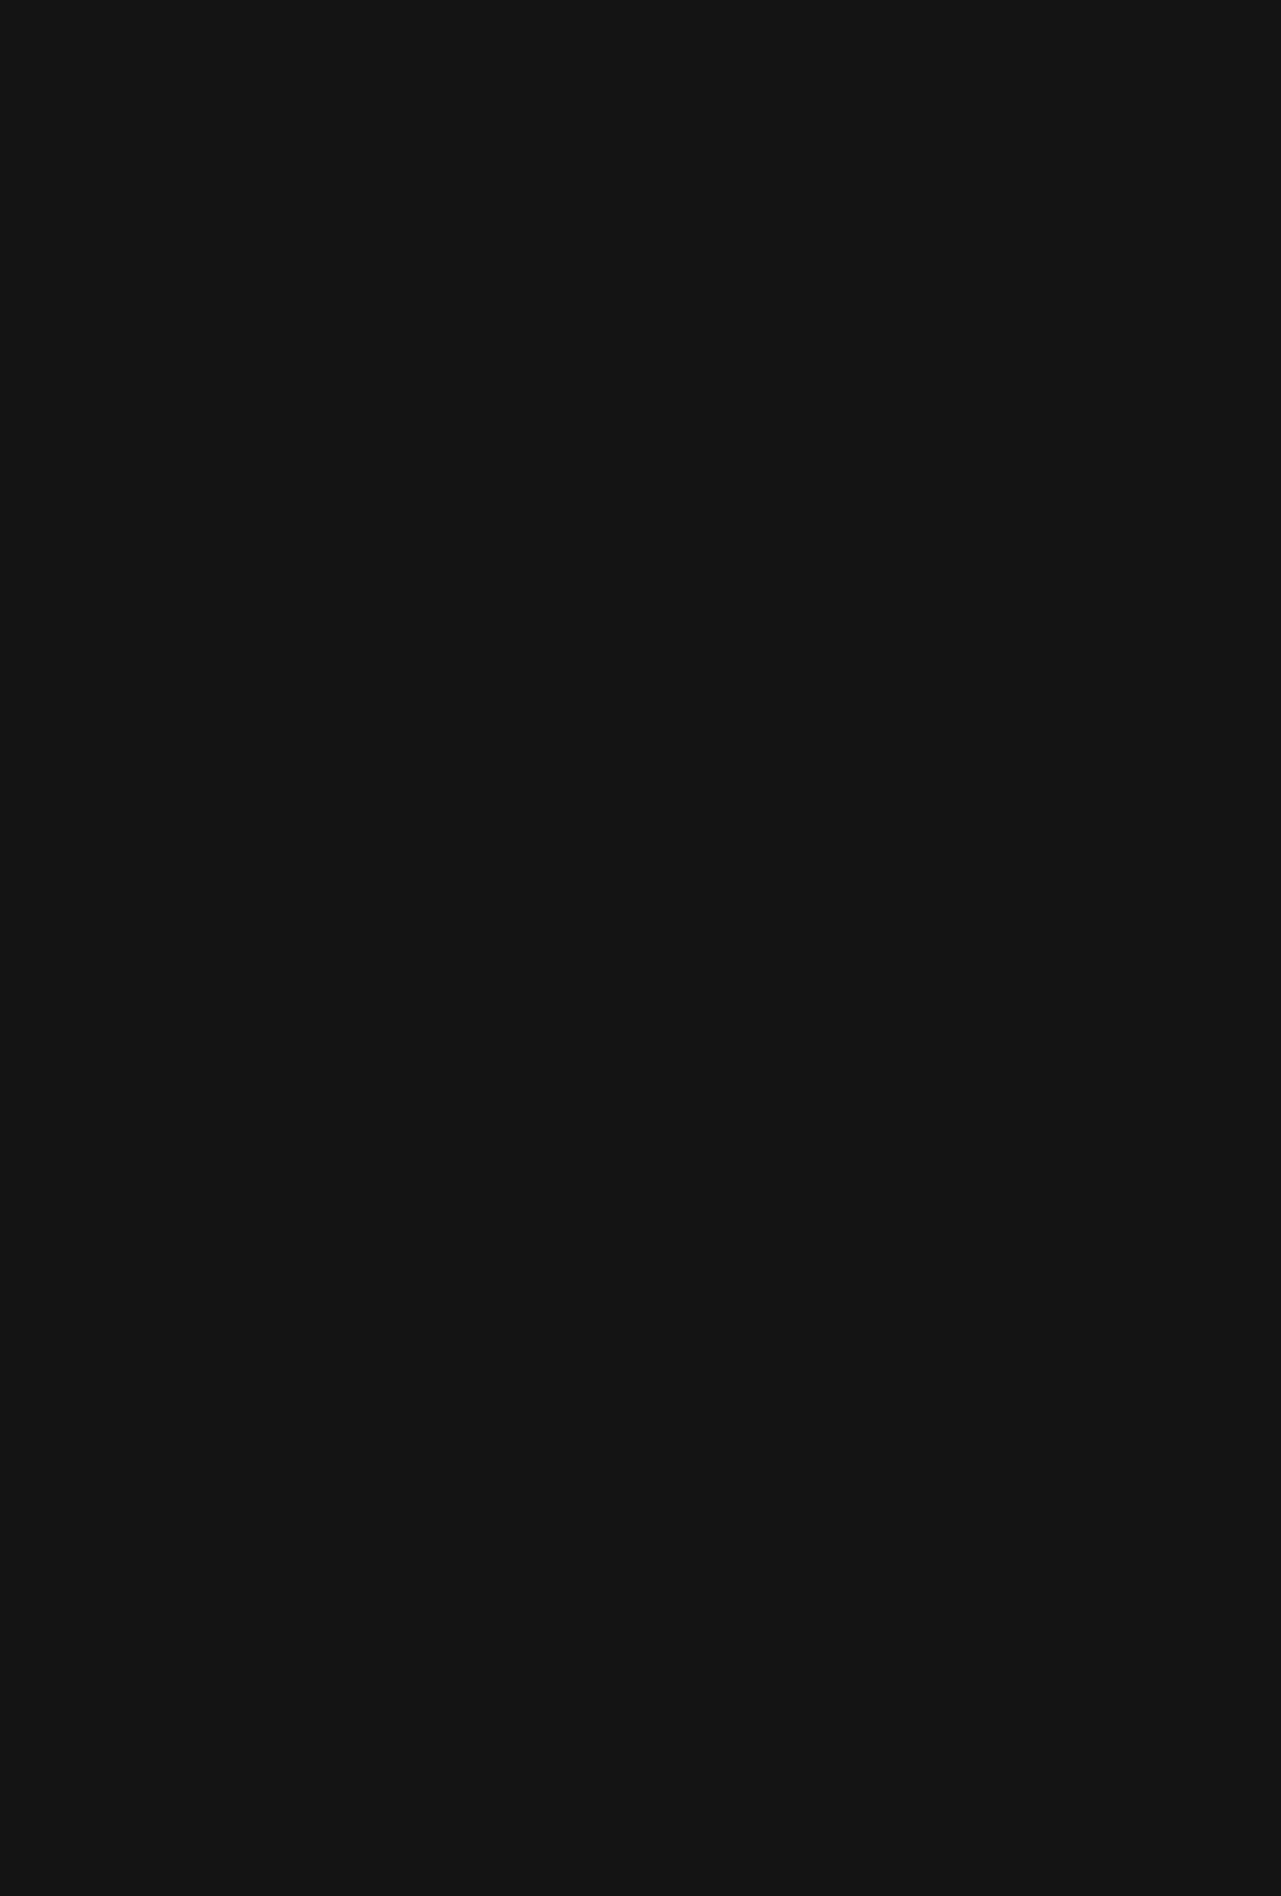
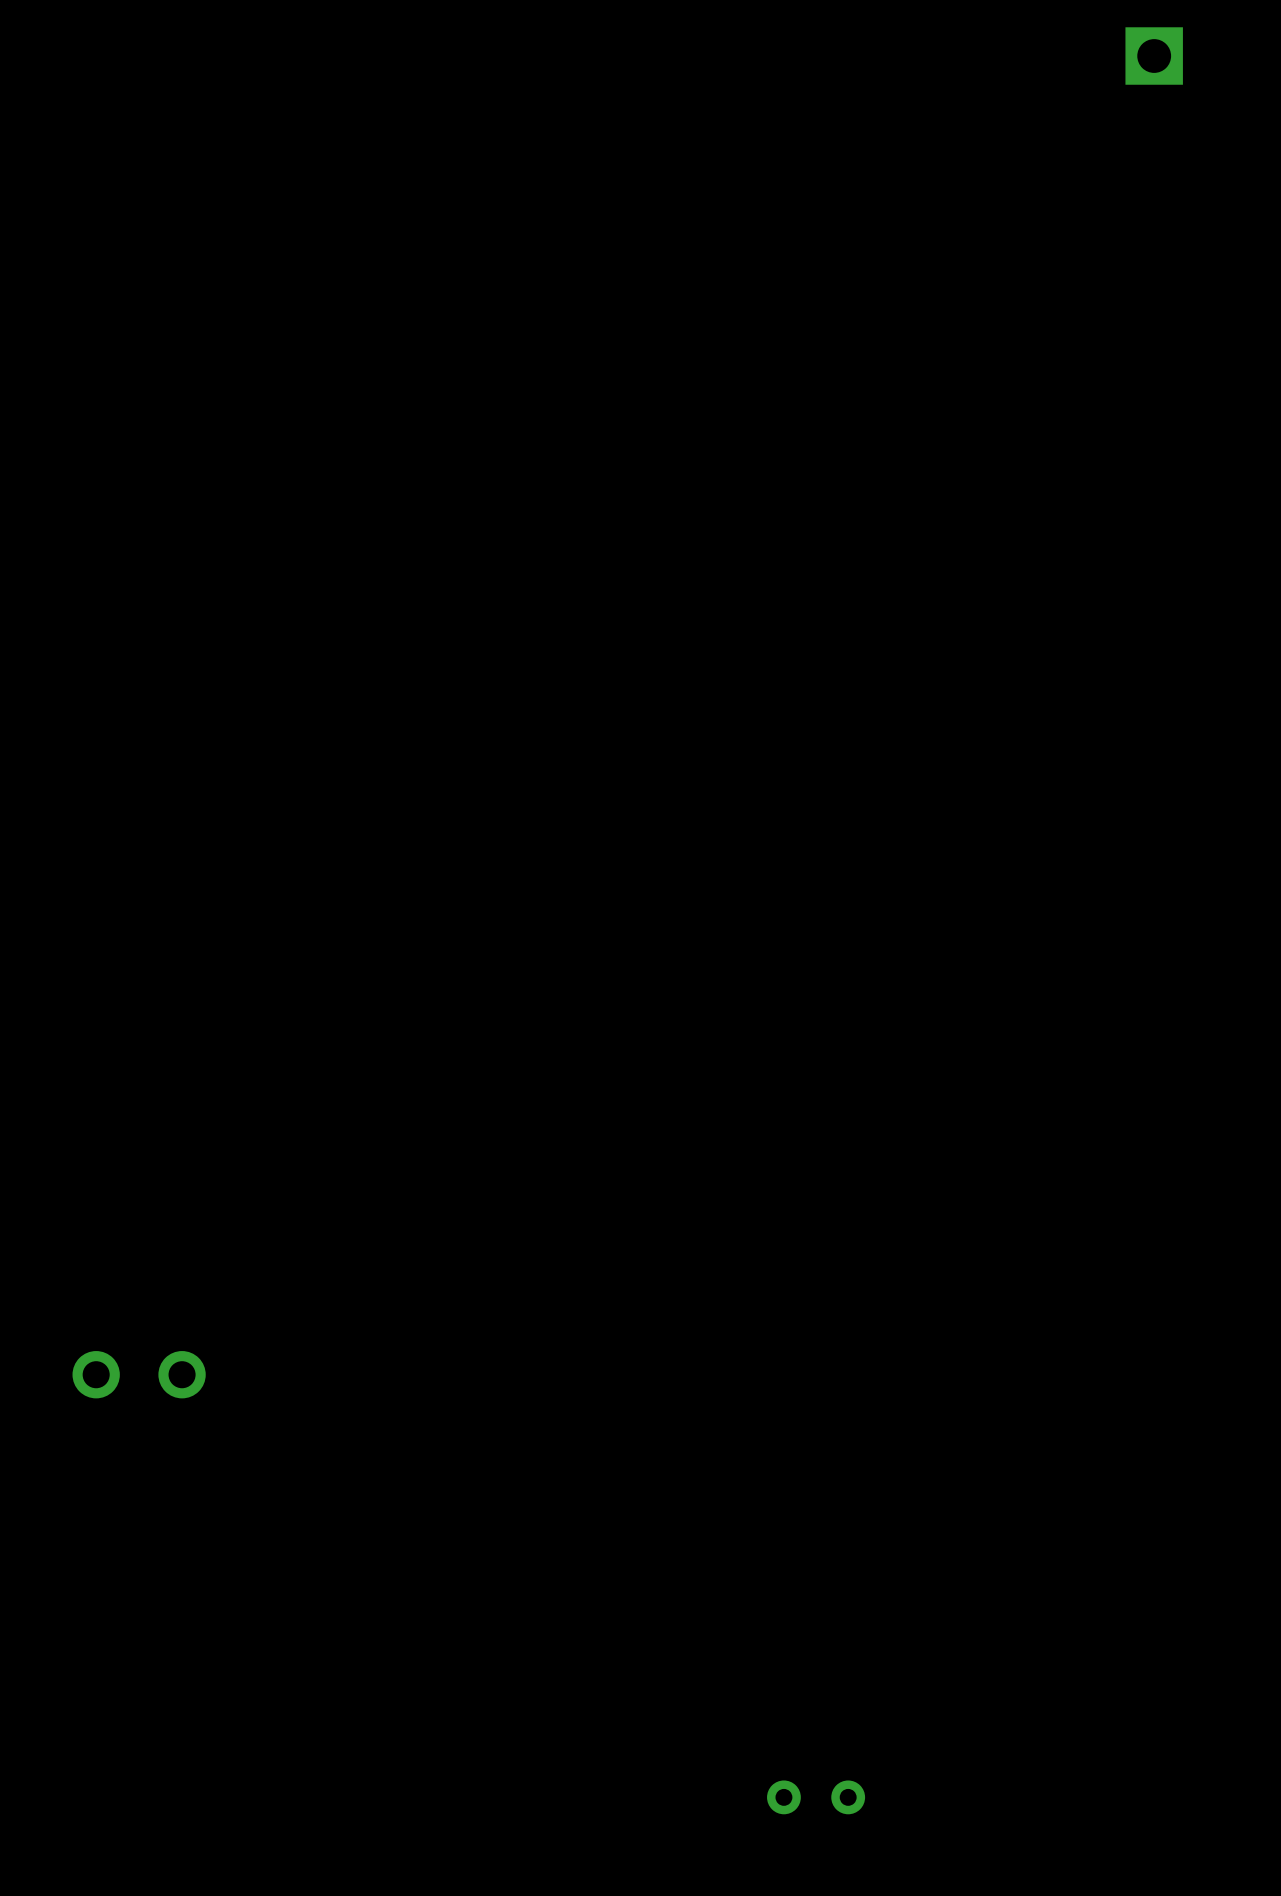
part: none -> (1154, 56)
part: none -> (139, 1374)
part: none -> (816, 1797)

